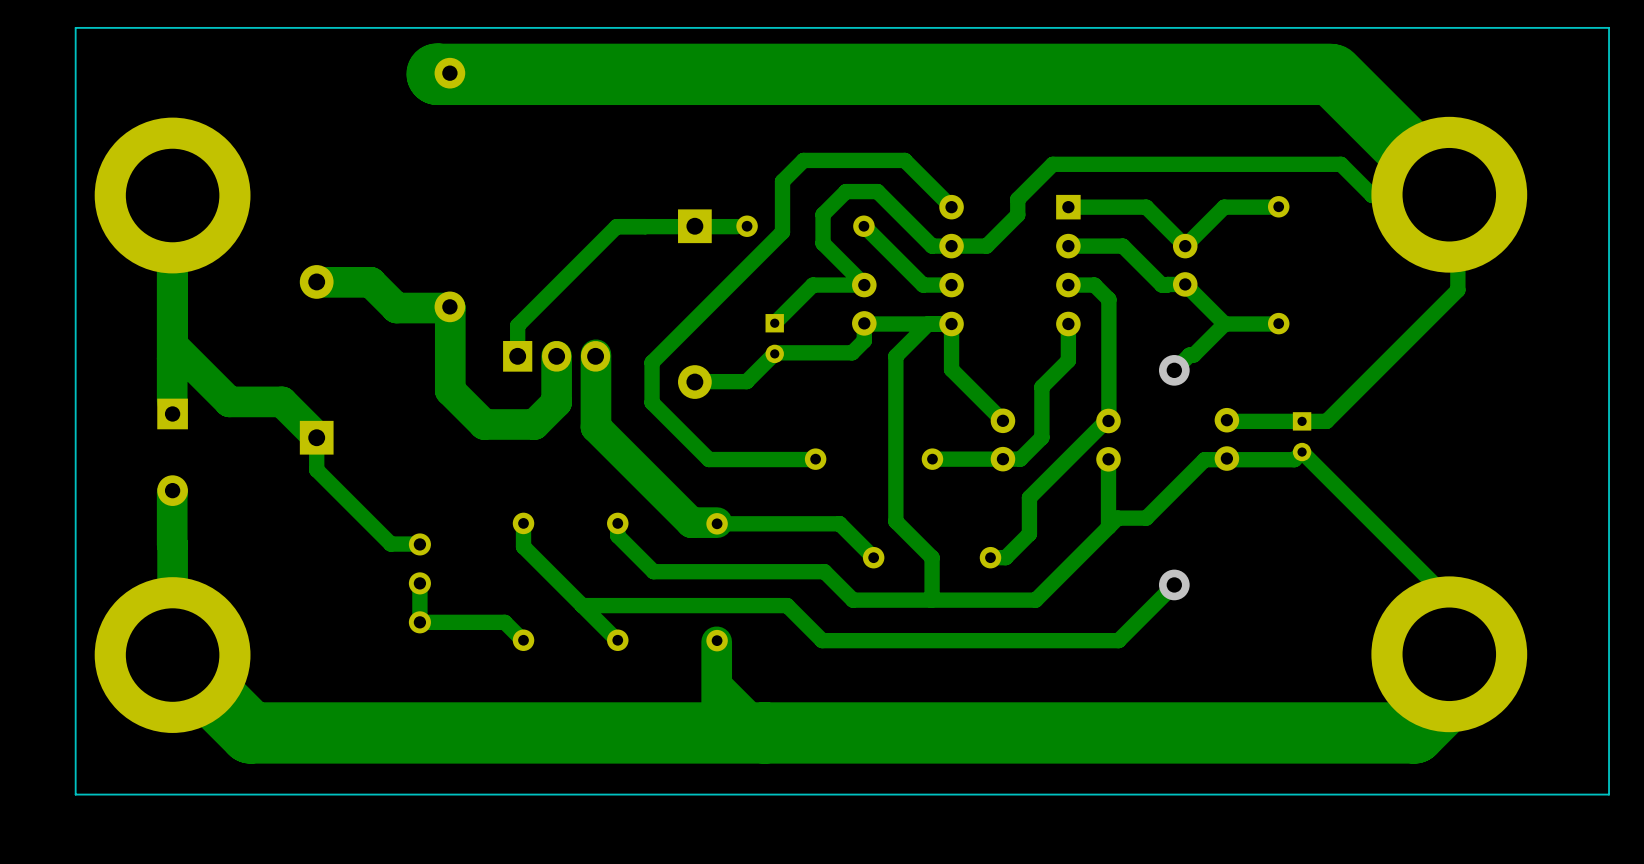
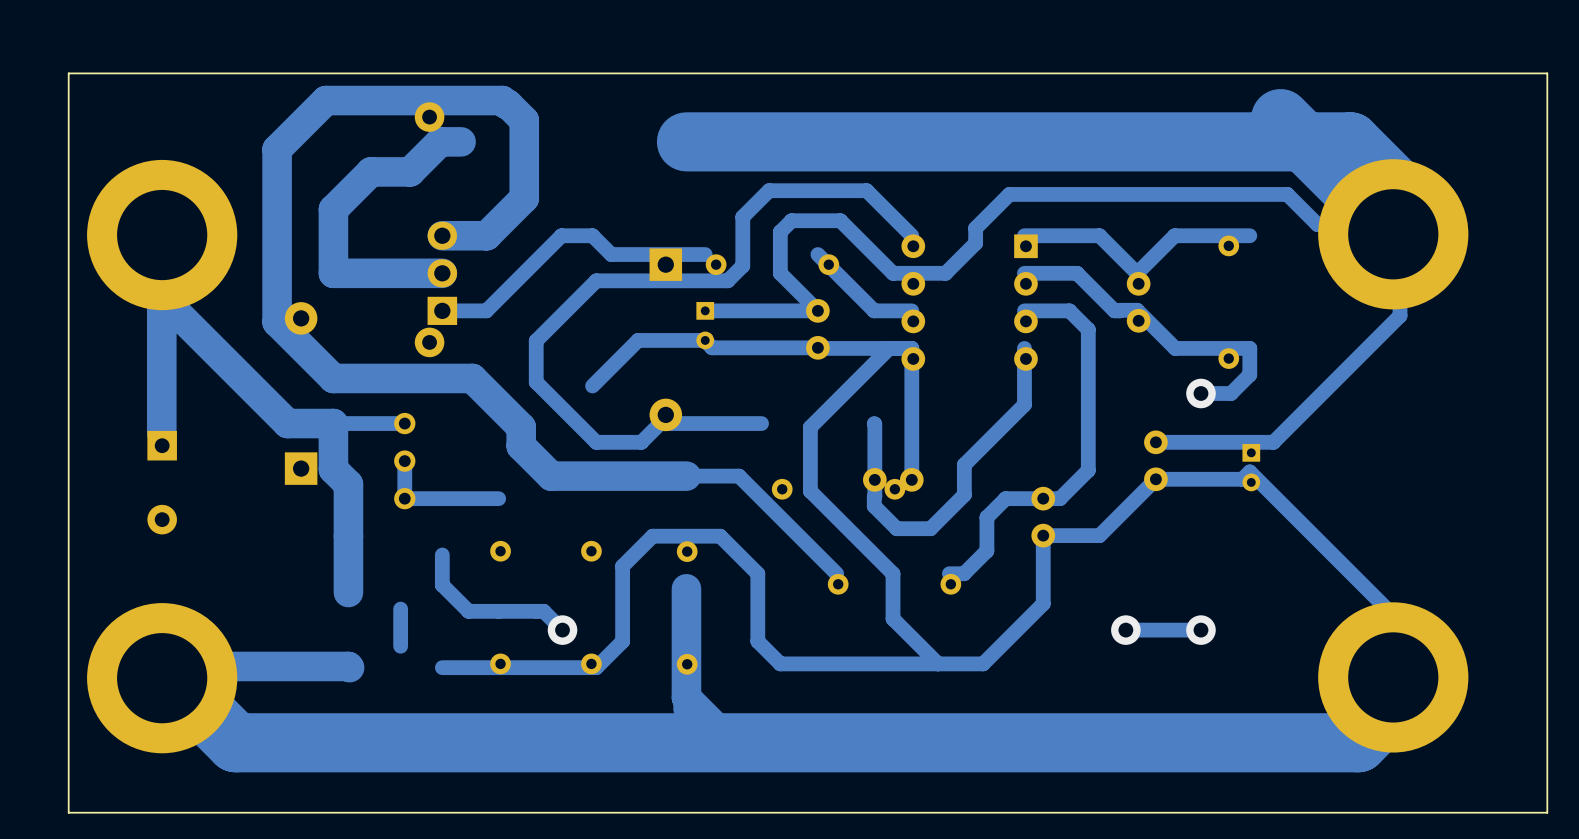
track: (437, 73) (1330, 74) -> none
track: none -> (461, 141) (440, 141) (410, 171) (370, 171) (333, 209) (333, 273) (442, 273)
track: none -> (686, 141) (1350, 141) (1433, 224)
track: none -> (160, 224) (160, 296) (287, 423) (333, 423)
track: none -> (1433, 224) (1400, 257) (1400, 315) (1273, 442) (1155, 442)
track: none -> (1433, 224) (1317, 224) (1287, 194) (1009, 194) (975, 228) (975, 243) (945, 273) (893, 273) (840, 220) (791, 220) (780, 232) (780, 273) (817, 310) (705, 310)
track: (172, 195) (172, 345) (229, 401) (282, 401) (317, 436) -> none
track: none -> (442, 235) (486, 235) (524, 198) (524, 120) (502, 100) (325, 100) (277, 149) (277, 322) (333, 378) (472, 378) (521, 427) (521, 446) (551, 476) (739, 476) (836, 573)
track: none -> (911, 235) (866, 190) (769, 190) (742, 216) (742, 265) (727, 280) (596, 280) (536, 340) (536, 382) (596, 442) (641, 442) (660, 423) (761, 423)
track: none -> (1249, 235) (1174, 235) (1137, 273) (1099, 235) (1024, 235)
track: (1279, 206) (1224, 207) (1185, 246) (1146, 207) (1068, 207) -> none
track: (951, 207) (904, 160) (803, 160) (782, 181) (782, 232) (652, 362) (652, 402) (708, 459) (816, 459) -> none
track: none -> (705, 254) (611, 254) (592, 235) (561, 235) (486, 310) (442, 310)
track: none -> (817, 254) (874, 310) (911, 310)
track: (737, 226) (616, 226) (517, 325) (517, 356) -> none
track: (864, 226) (923, 285) (951, 285) -> none
track: none -> (1024, 273) (1077, 273) (1114, 310) (1137, 310) (1175, 348) (1249, 348) (1249, 374) (1231, 393) (1200, 393)
track: (1068, 246) (1122, 246) (1161, 285) (1185, 284) (1224, 324) -> none
track: none -> (1024, 310) (1069, 310) (1088, 329) (1088, 470) (1059, 498) (1005, 498) (986, 517) (986, 550) (963, 573) (949, 573)
track: (315, 282) (370, 282) (396, 308) (450, 308) (450, 390) (484, 424) (534, 424) (556, 402) (556, 356) -> none
track: (1068, 285) (1094, 285) (1108, 299) (1108, 419) -> none
part position: (864, 304) -> (817, 329)
track: none -> (889, 348) (810, 427) (810, 491) (893, 573) (893, 618) (938, 663)
track: none -> (1024, 348) (1024, 404) (964, 464) (964, 494) (930, 528) (896, 528) (874, 506) (874, 423)
track: (774, 323) (812, 285) (864, 285) (823, 243) (823, 214) (846, 191) (877, 191) (932, 246) (986, 246) (1017, 214) (1017, 199) (1052, 164) (1341, 164) (1372, 195) (1492, 195) (1457, 229) (1457, 290) (1326, 421) (1226, 420) -> none
track: (863, 323) (951, 324) (951, 369) (1002, 420) -> none
track: (864, 323) (864, 340) (852, 352) (775, 352) (746, 381) (694, 381) -> none
track: (928, 324) (895, 356) (895, 521) (932, 557) (931, 600) -> none
track: (1068, 324) (1068, 360) (1041, 387) (1041, 437) (1020, 459) (1002, 459) -> none
track: (1224, 324) (1193, 355) (1189, 355) (1174, 370) -> none
track: (1278, 324) (1224, 324) -> none
part position: (774, 338) -> (705, 325)
track: none -> (592, 385) (638, 340) (705, 340) (712, 347) (911, 348) (911, 479)
track: (595, 354) (595, 427) (691, 522) (717, 522) -> none
part rotation: 0° (556, 356) -> 90° counterclockwise (442, 273)
part position: (556, 356) -> (442, 273)
via position: (1174, 370) -> (1200, 393)
track: none -> (333, 423) (333, 469) (348, 484) (348, 592)
track: none -> (404, 423) (333, 423)
track: (1106, 420) (1029, 497) (1029, 533) (1005, 557) (990, 557) -> none
track: none -> (404, 461) (404, 498) (498, 498)
track: (316, 437) (316, 469) (390, 544) (419, 544) -> none
part: (1002, 439) -> none
part position: (1226, 439) -> (1155, 460)
part: (1108, 440) -> none
part: none -> (893, 479)
track: (932, 459) (1002, 459) -> none
track: (1108, 459) (1108, 526) -> none
part: none -> (1043, 517)
track: (172, 492) (172, 655) -> none
track: (523, 523) (523, 546) (616, 640) -> none
track: (617, 523) (617, 535) (653, 571) (824, 571) (853, 600) (1035, 600) (1117, 518) (1146, 518) (1204, 459) (1294, 459) (1302, 452) (1492, 642) (1492, 655) (1414, 732) (250, 732) (172, 655) -> none
track: (717, 523) (839, 523) (873, 557) -> none
track: none -> (442, 554) (442, 585) (468, 611) (543, 611) (562, 630)
track: none -> (686, 588) (686, 697) (731, 742)
part position: (419, 583) -> (404, 461)
track: (1174, 584) (1118, 640) (822, 640) (787, 605) (582, 605) -> none
via position: (1174, 584) -> (1125, 630)
via: none -> (562, 630)
track: none -> (1200, 630) (1125, 630)
via: none -> (1200, 630)
track: (419, 622) (504, 622) (522, 639) -> none
track: (716, 641) (716, 705) -> none
track: none -> (442, 667) (596, 667) (622, 641) (622, 566) (652, 536) (720, 536) (757, 573) (757, 641) (780, 663) (983, 663) (1043, 603) (1043, 535) (1099, 535) (1155, 479) (1242, 479) (1249, 471) (1433, 655) (1433, 667) (1358, 742) (235, 742) (160, 667) (349, 667)

